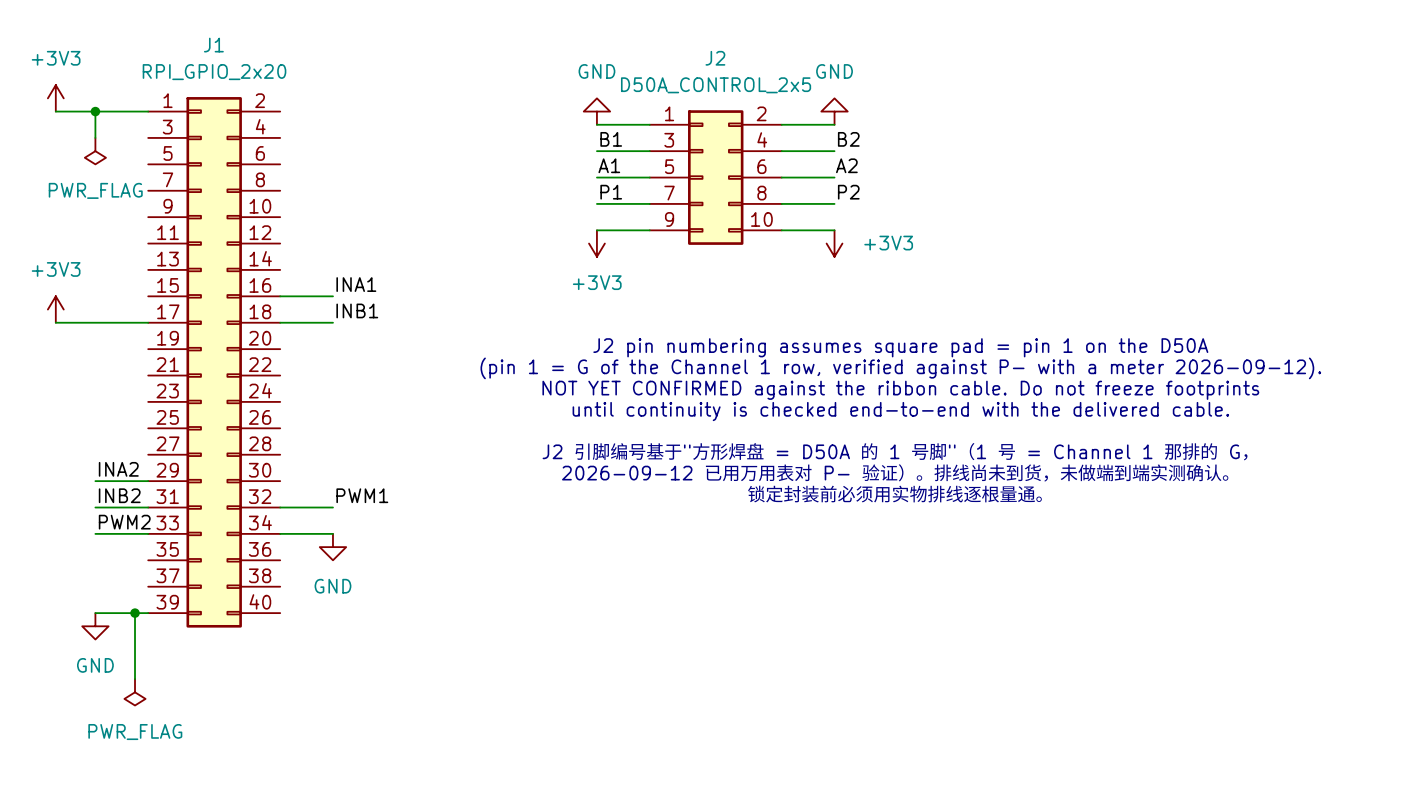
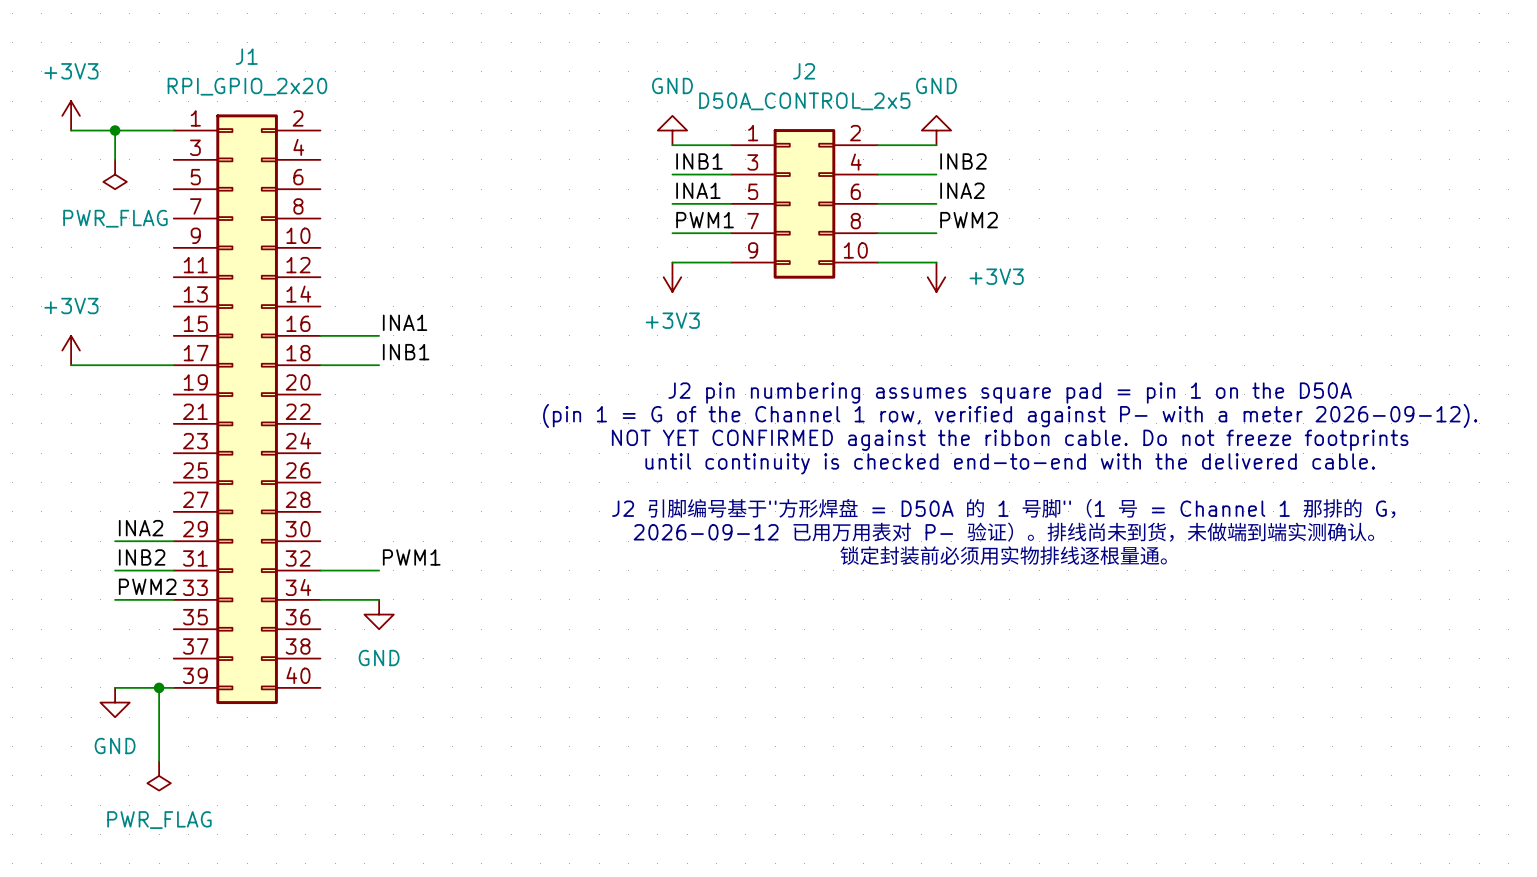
label: B1 (611, 139) -> INB1 (699, 161)
label: B2 (848, 139) -> INB2 (963, 161)
label: A1 (609, 165) -> INA1 (698, 190)
label: A2 (846, 165) -> INA2 (962, 190)
label: P1 (611, 192) -> PWM1 (705, 220)
label: P2 (848, 192) -> PWM2 (969, 220)

